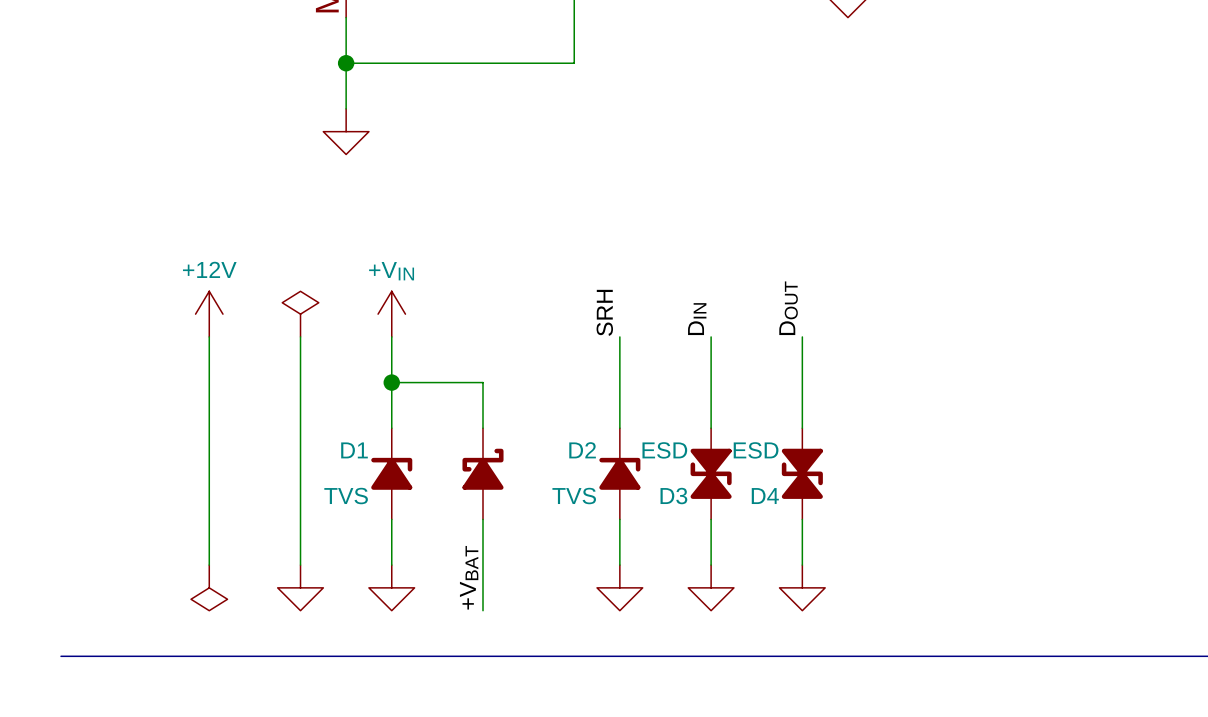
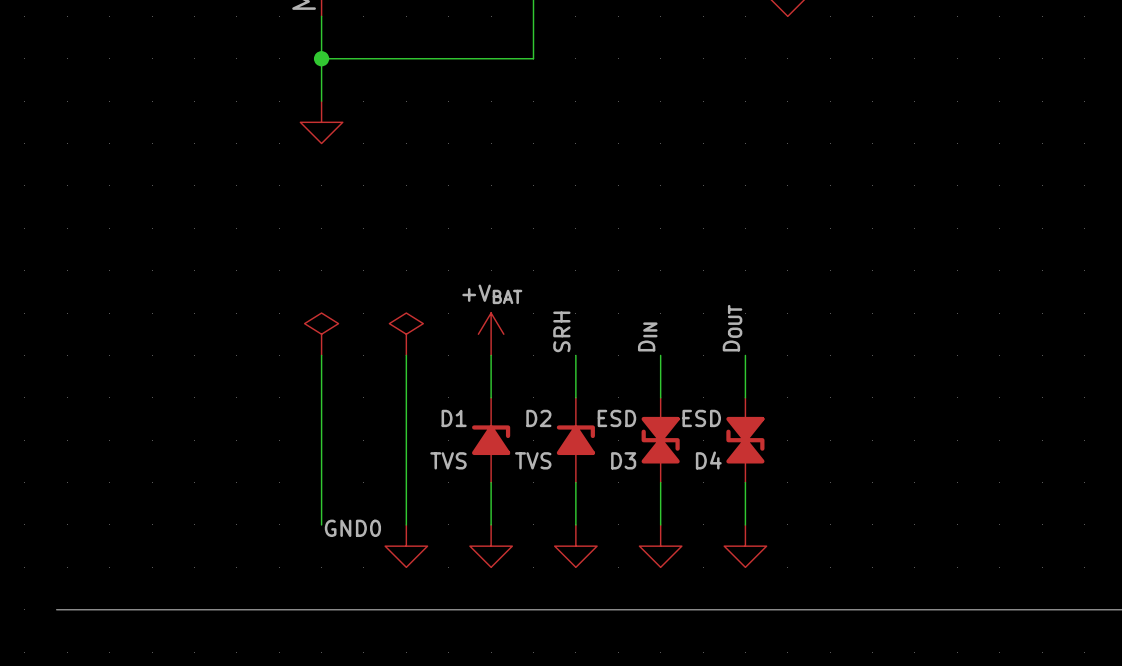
label position: DOUT (788, 308) -> DOUT (732, 328)
label position: SRH (604, 312) -> SRH (561, 331)
power symbol: +12V (209, 314) -> none
power symbol position: (300, 314) -> (321, 334)
power symbol: +VIN (391, 314) -> none
label position: DIN (697, 319) -> DIN (647, 336)
wire: (209, 336) (209, 565) -> none
wire: (300, 336) (300, 565) -> none
wire: (391, 336) (391, 428) -> none
wire: (619, 336) (619, 382) -> (491, 355) (491, 397)
wire: (711, 336) (711, 382) -> none
wire: (802, 336) (802, 382) -> none
power symbol: none -> (406, 334)
power symbol: none -> +VBAT (491, 334)
wire: none -> (321, 355) (321, 524)
wire: (391, 382) (483, 382) (483, 428) -> none
junction: (391, 382) -> none
wire: none -> (406, 355) (406, 524)
D1 position: (391, 473) -> (491, 440)
part: (483, 473) -> none
wire: (391, 519) (391, 565) -> (491, 482) (491, 524)
wire: (483, 519) (483, 610) -> none
label: none -> GND0 (352, 528)
label: +VBAT (469, 577) -> none
power symbol: (209, 587) -> none
power symbol: (300, 587) -> none
power symbol position: (391, 587) -> (406, 546)
power symbol: none -> (491, 546)

